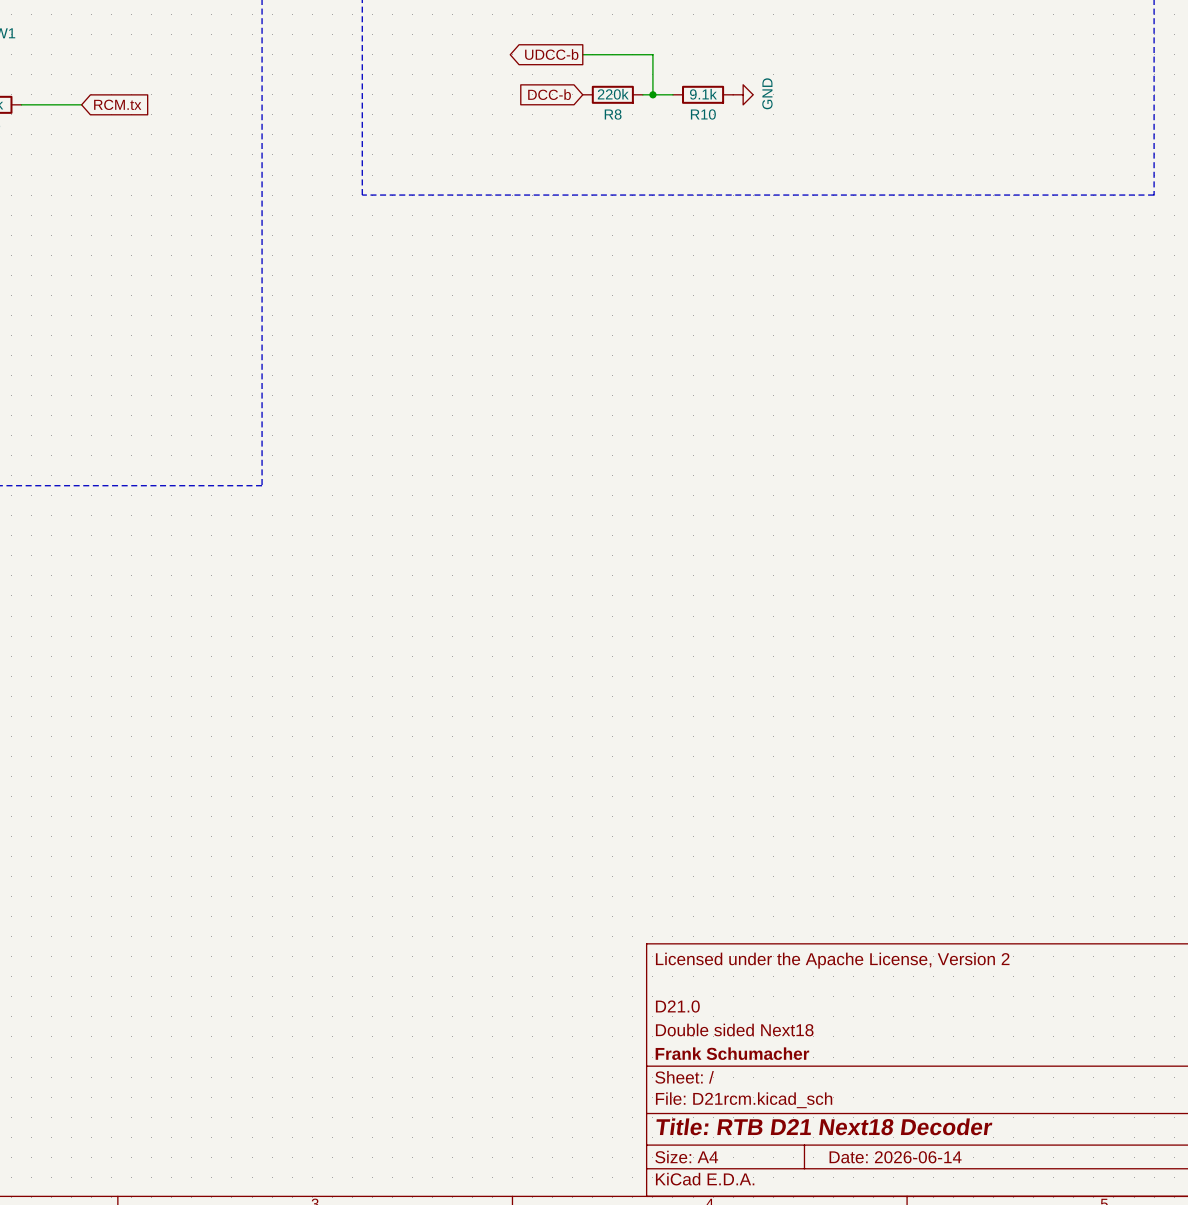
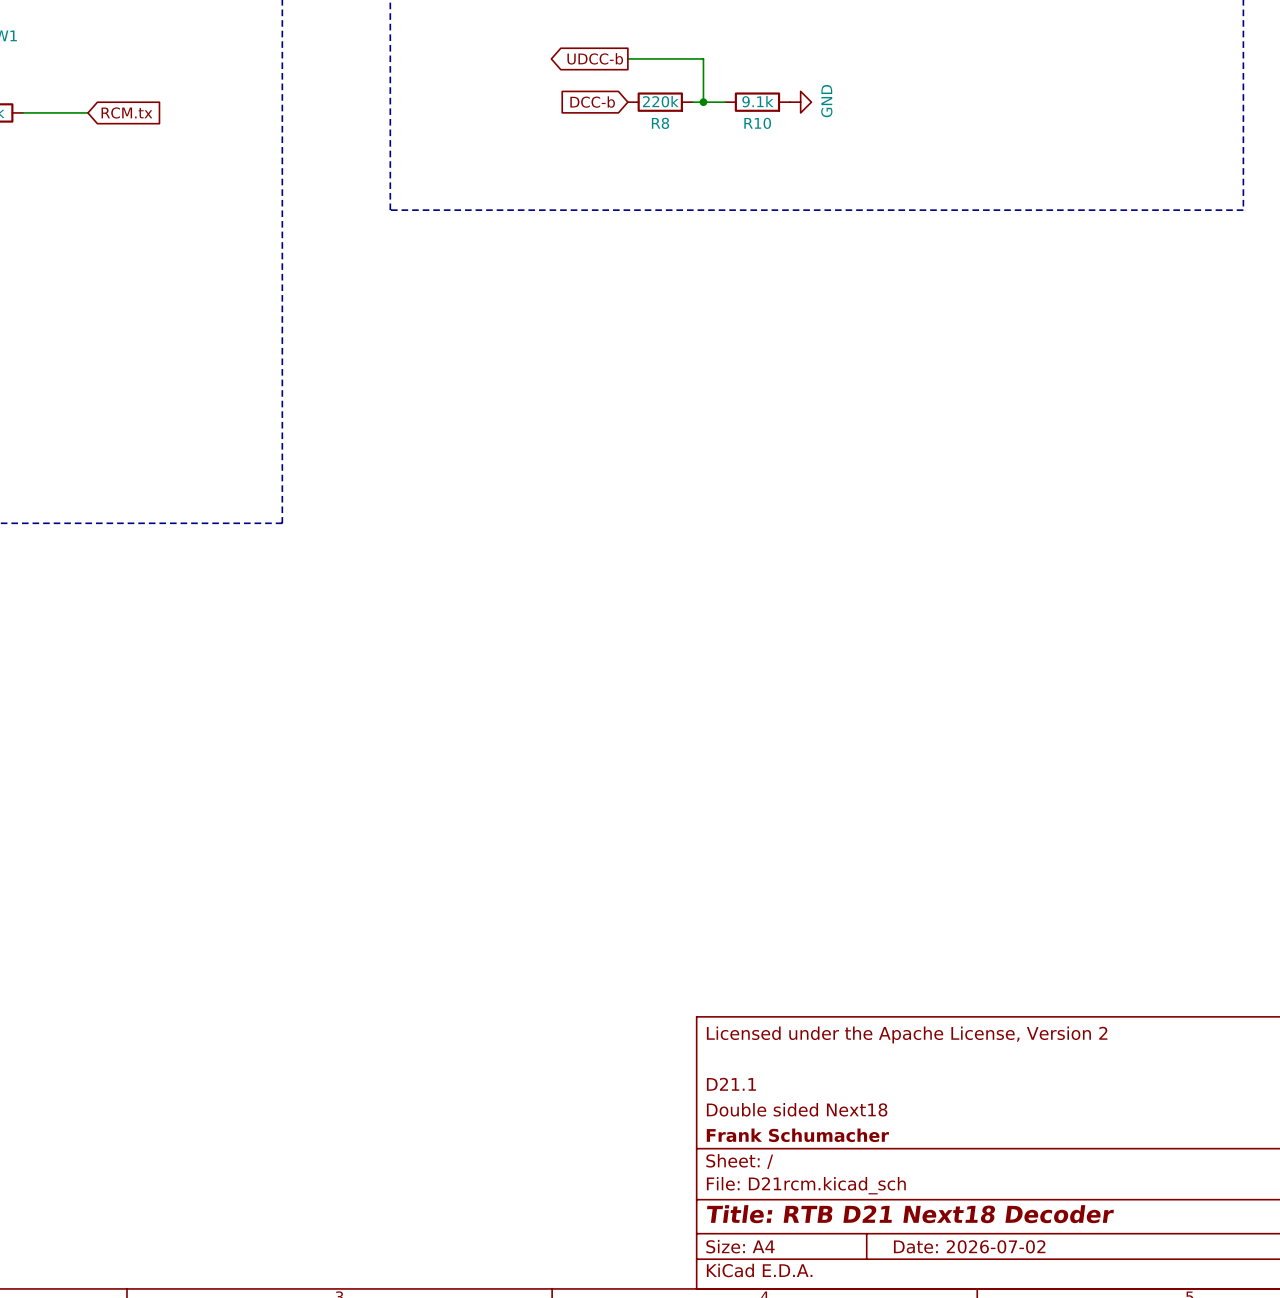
title block: D21.0 (677, 1006) -> D21.1 (731, 1084)
title block: Date: 2026-06-14 (895, 1157) -> Date: 2026-07-02 (969, 1246)

